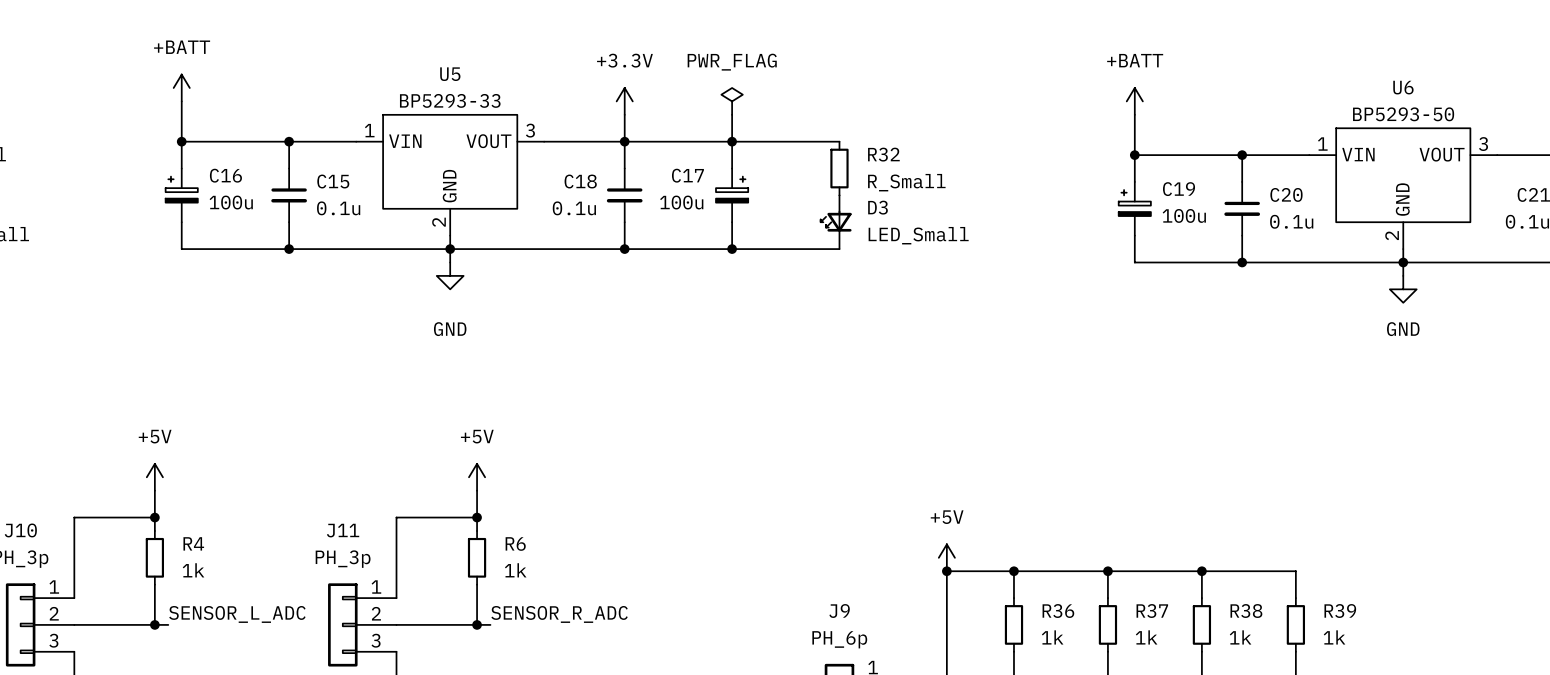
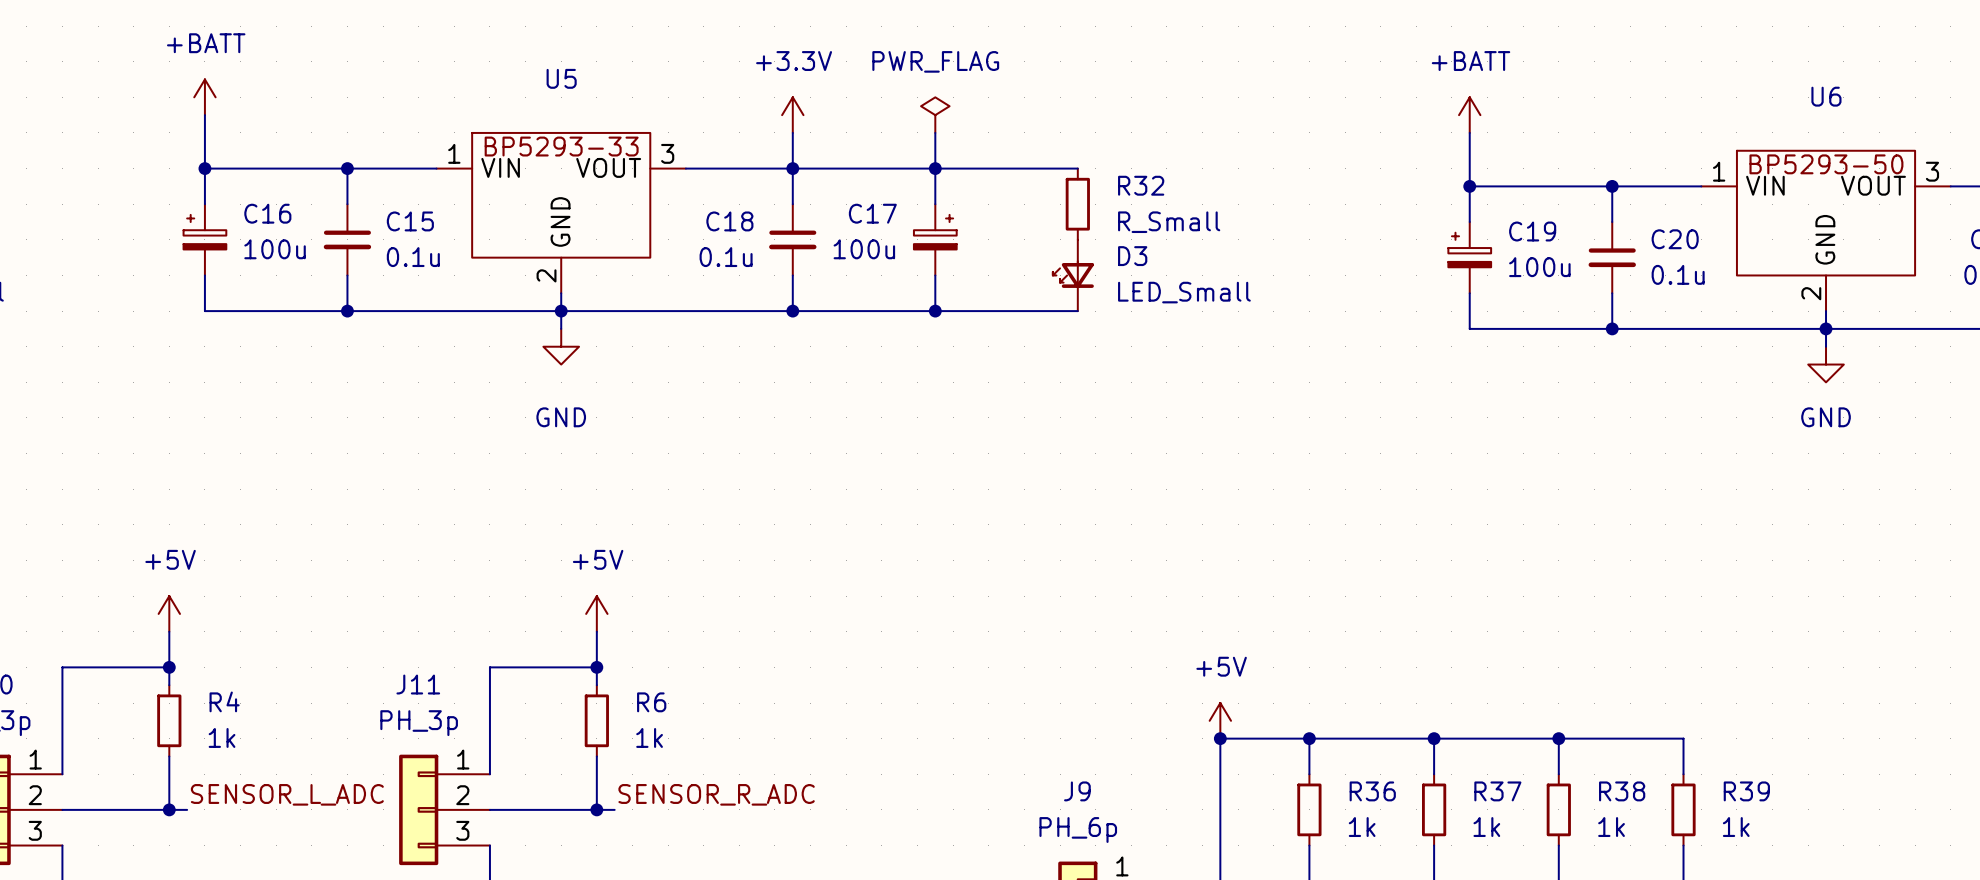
U5 value: BP5293-33 (450, 100) -> none
U6 value: BP5293-50 (1403, 114) -> none
U5 text: none -> BP5293-33 (561, 146)
U6 text: none -> BP5293-50 (1826, 164)

